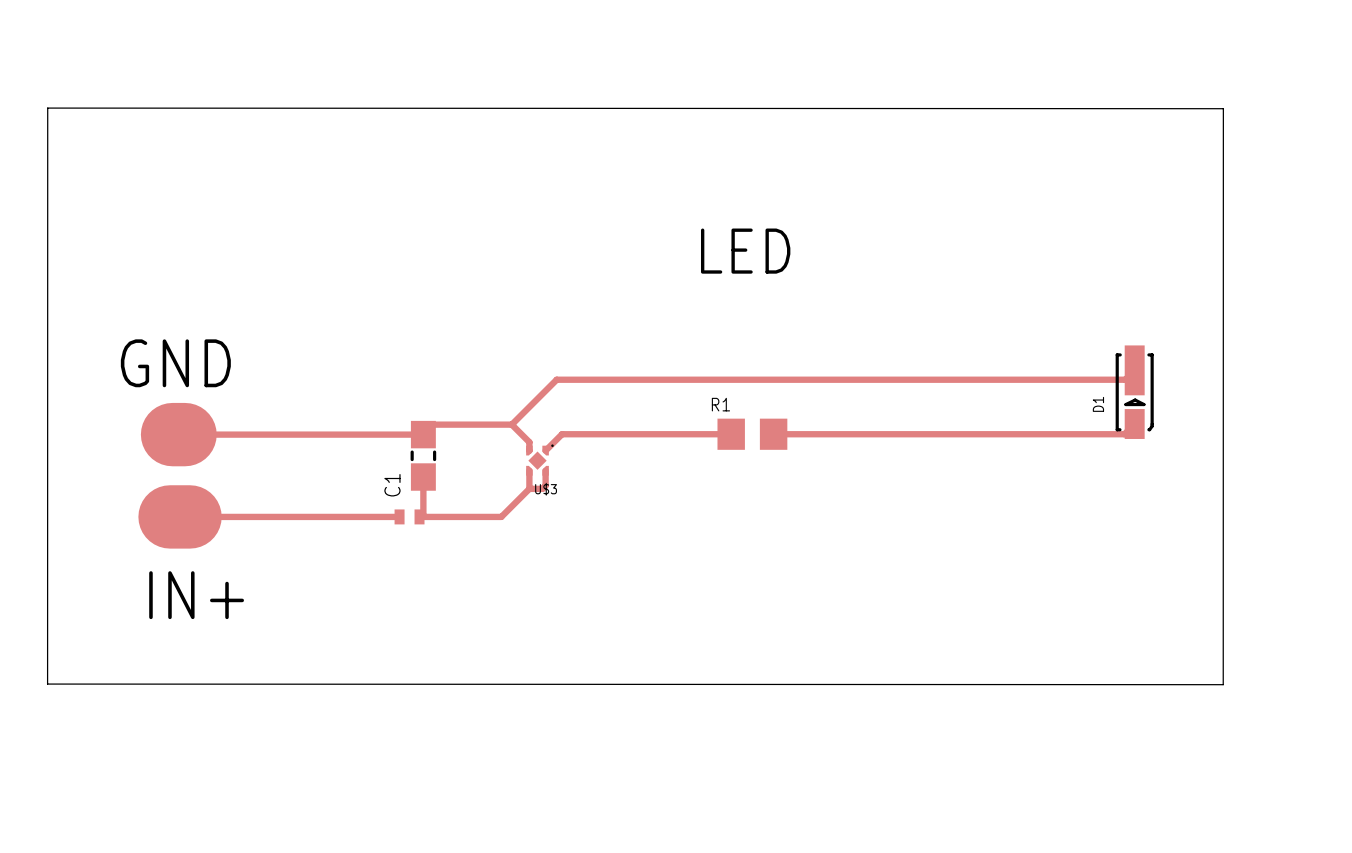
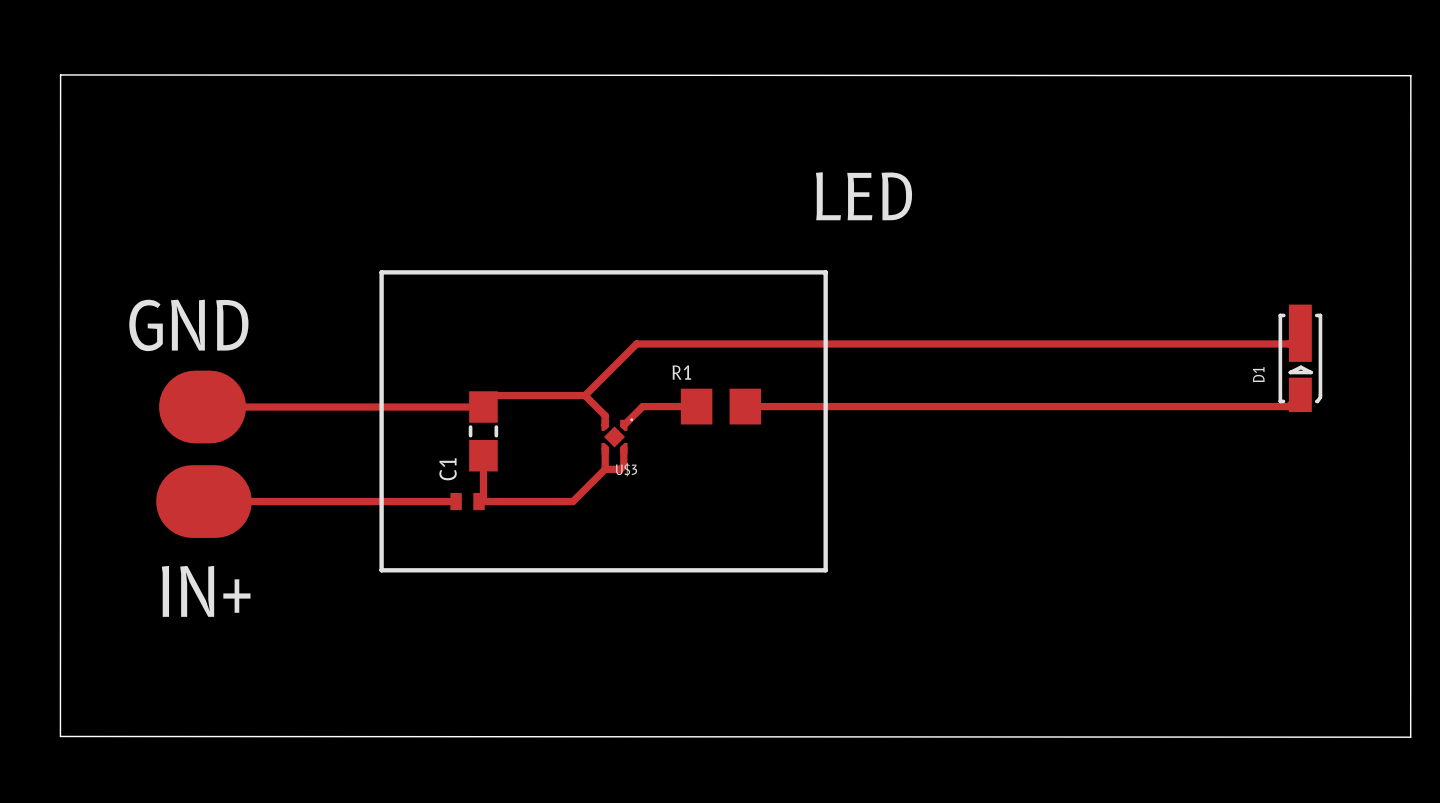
board edge: (47, 108) (1223, 108) (1223, 684) (47, 684) (47, 108) -> (60, 74) (60, 736) (1410, 737) (1410, 75) (60, 74)
line: none -> (381, 272) (825, 272) (825, 570) (381, 570) (381, 272)
top track: (608, 434) (651, 434) -> (836, 406) (885, 406)
R1 position: (752, 434) -> (720, 406)

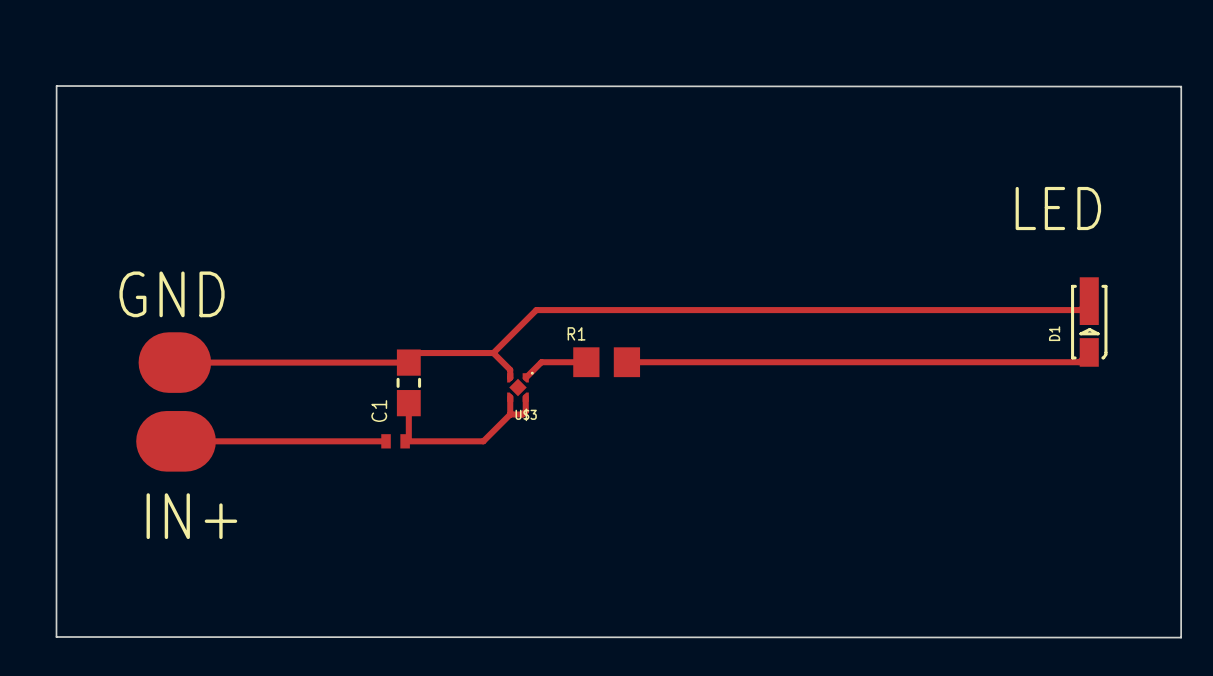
text position: LED (864, 196) -> LED (1058, 208)
line: (381, 272) (825, 272) (825, 570) (381, 570) (381, 272) -> none

